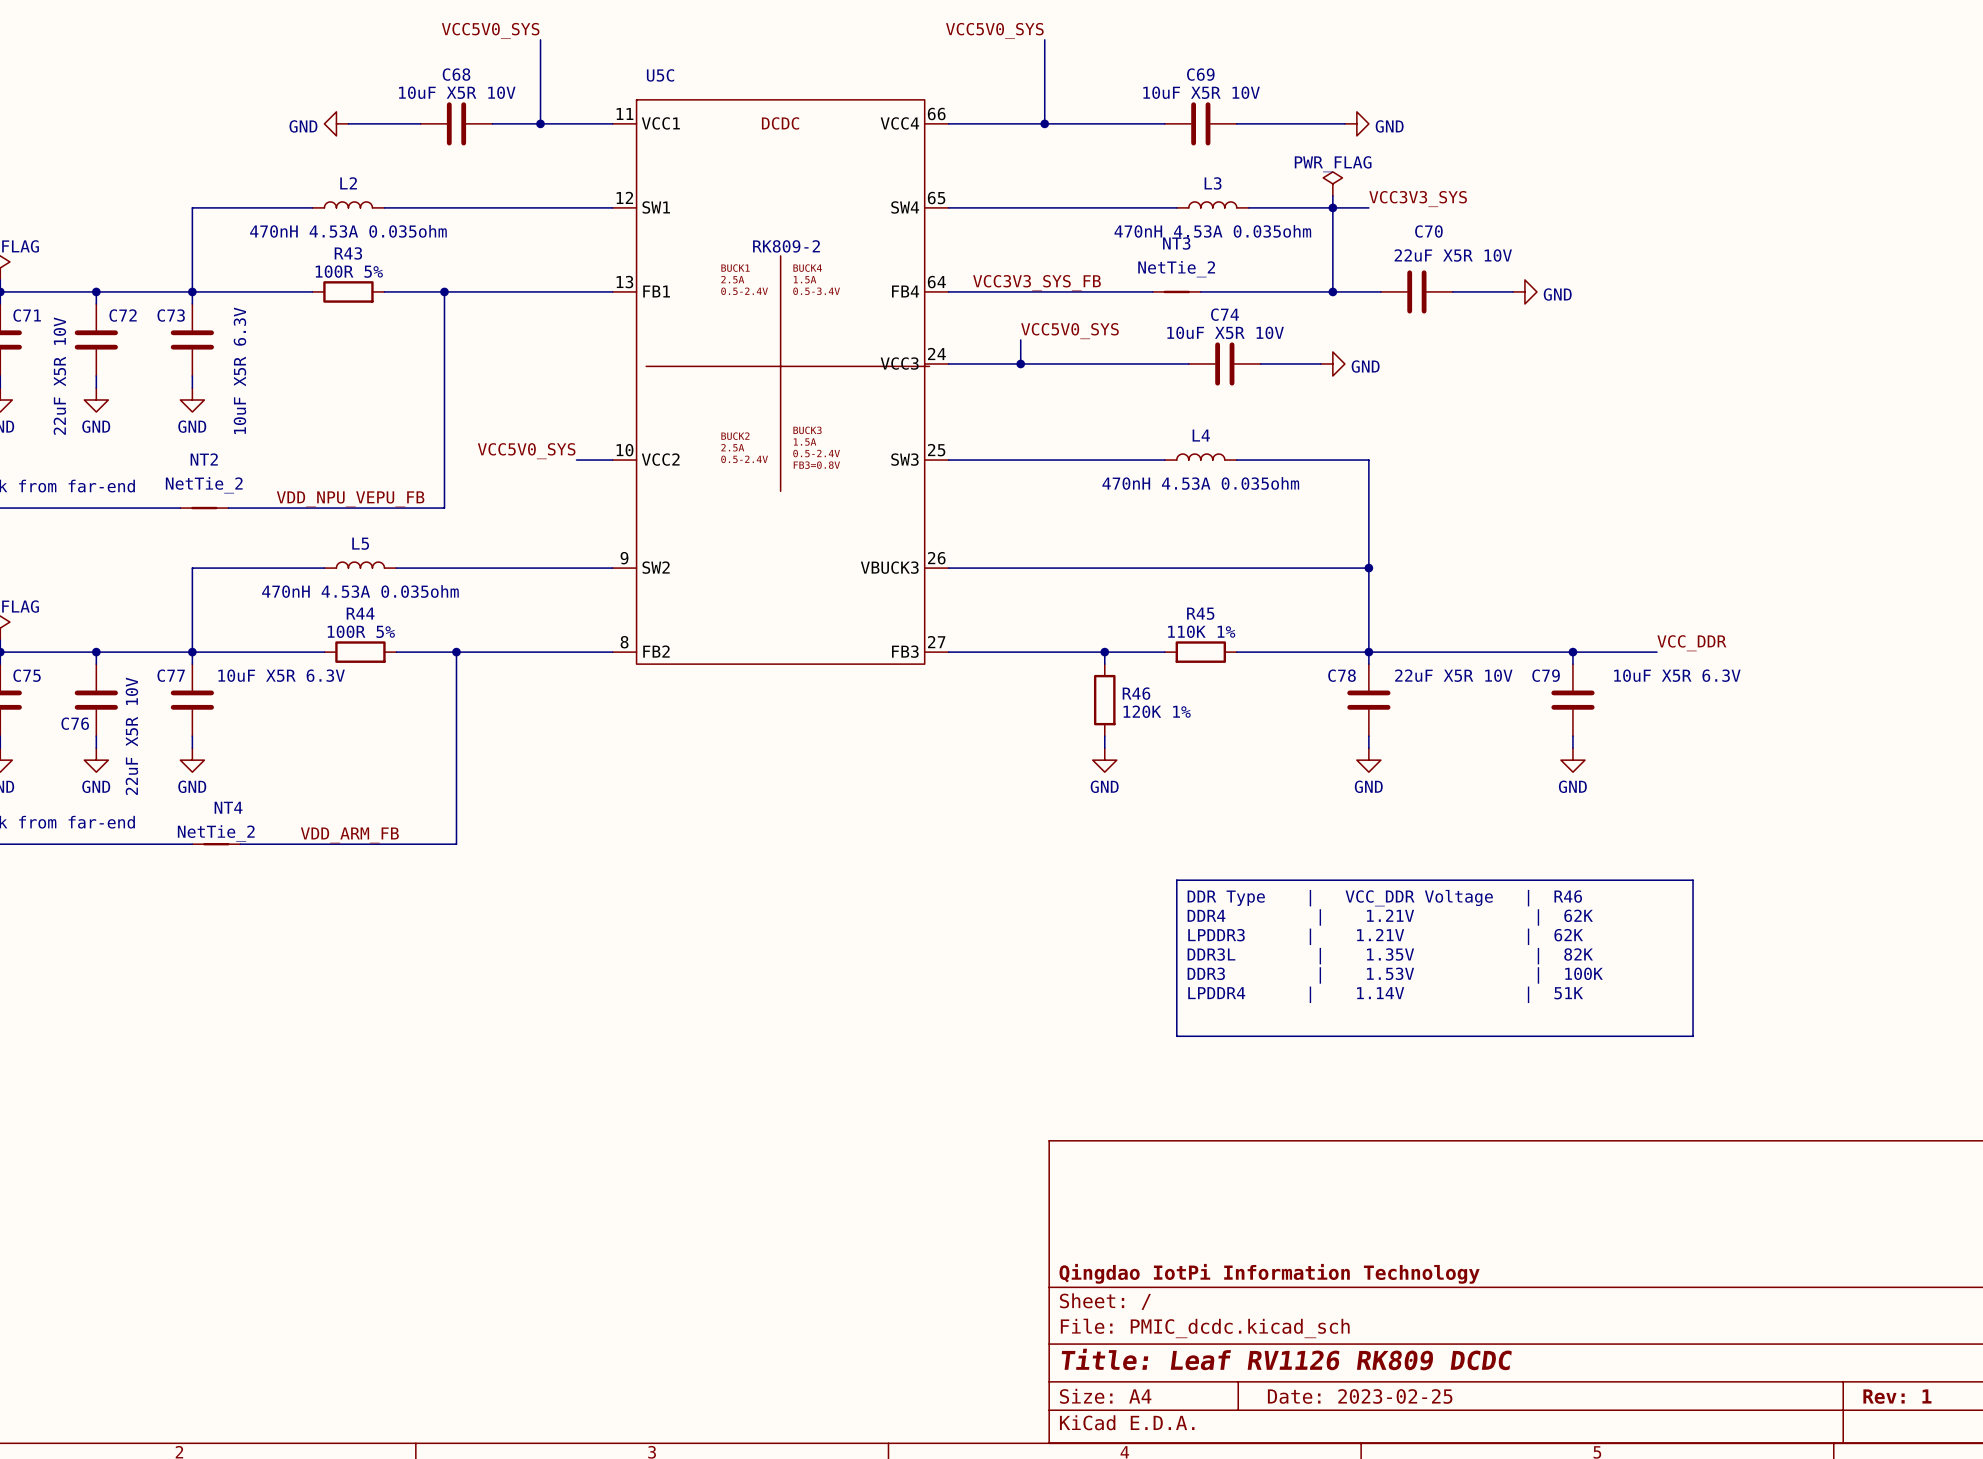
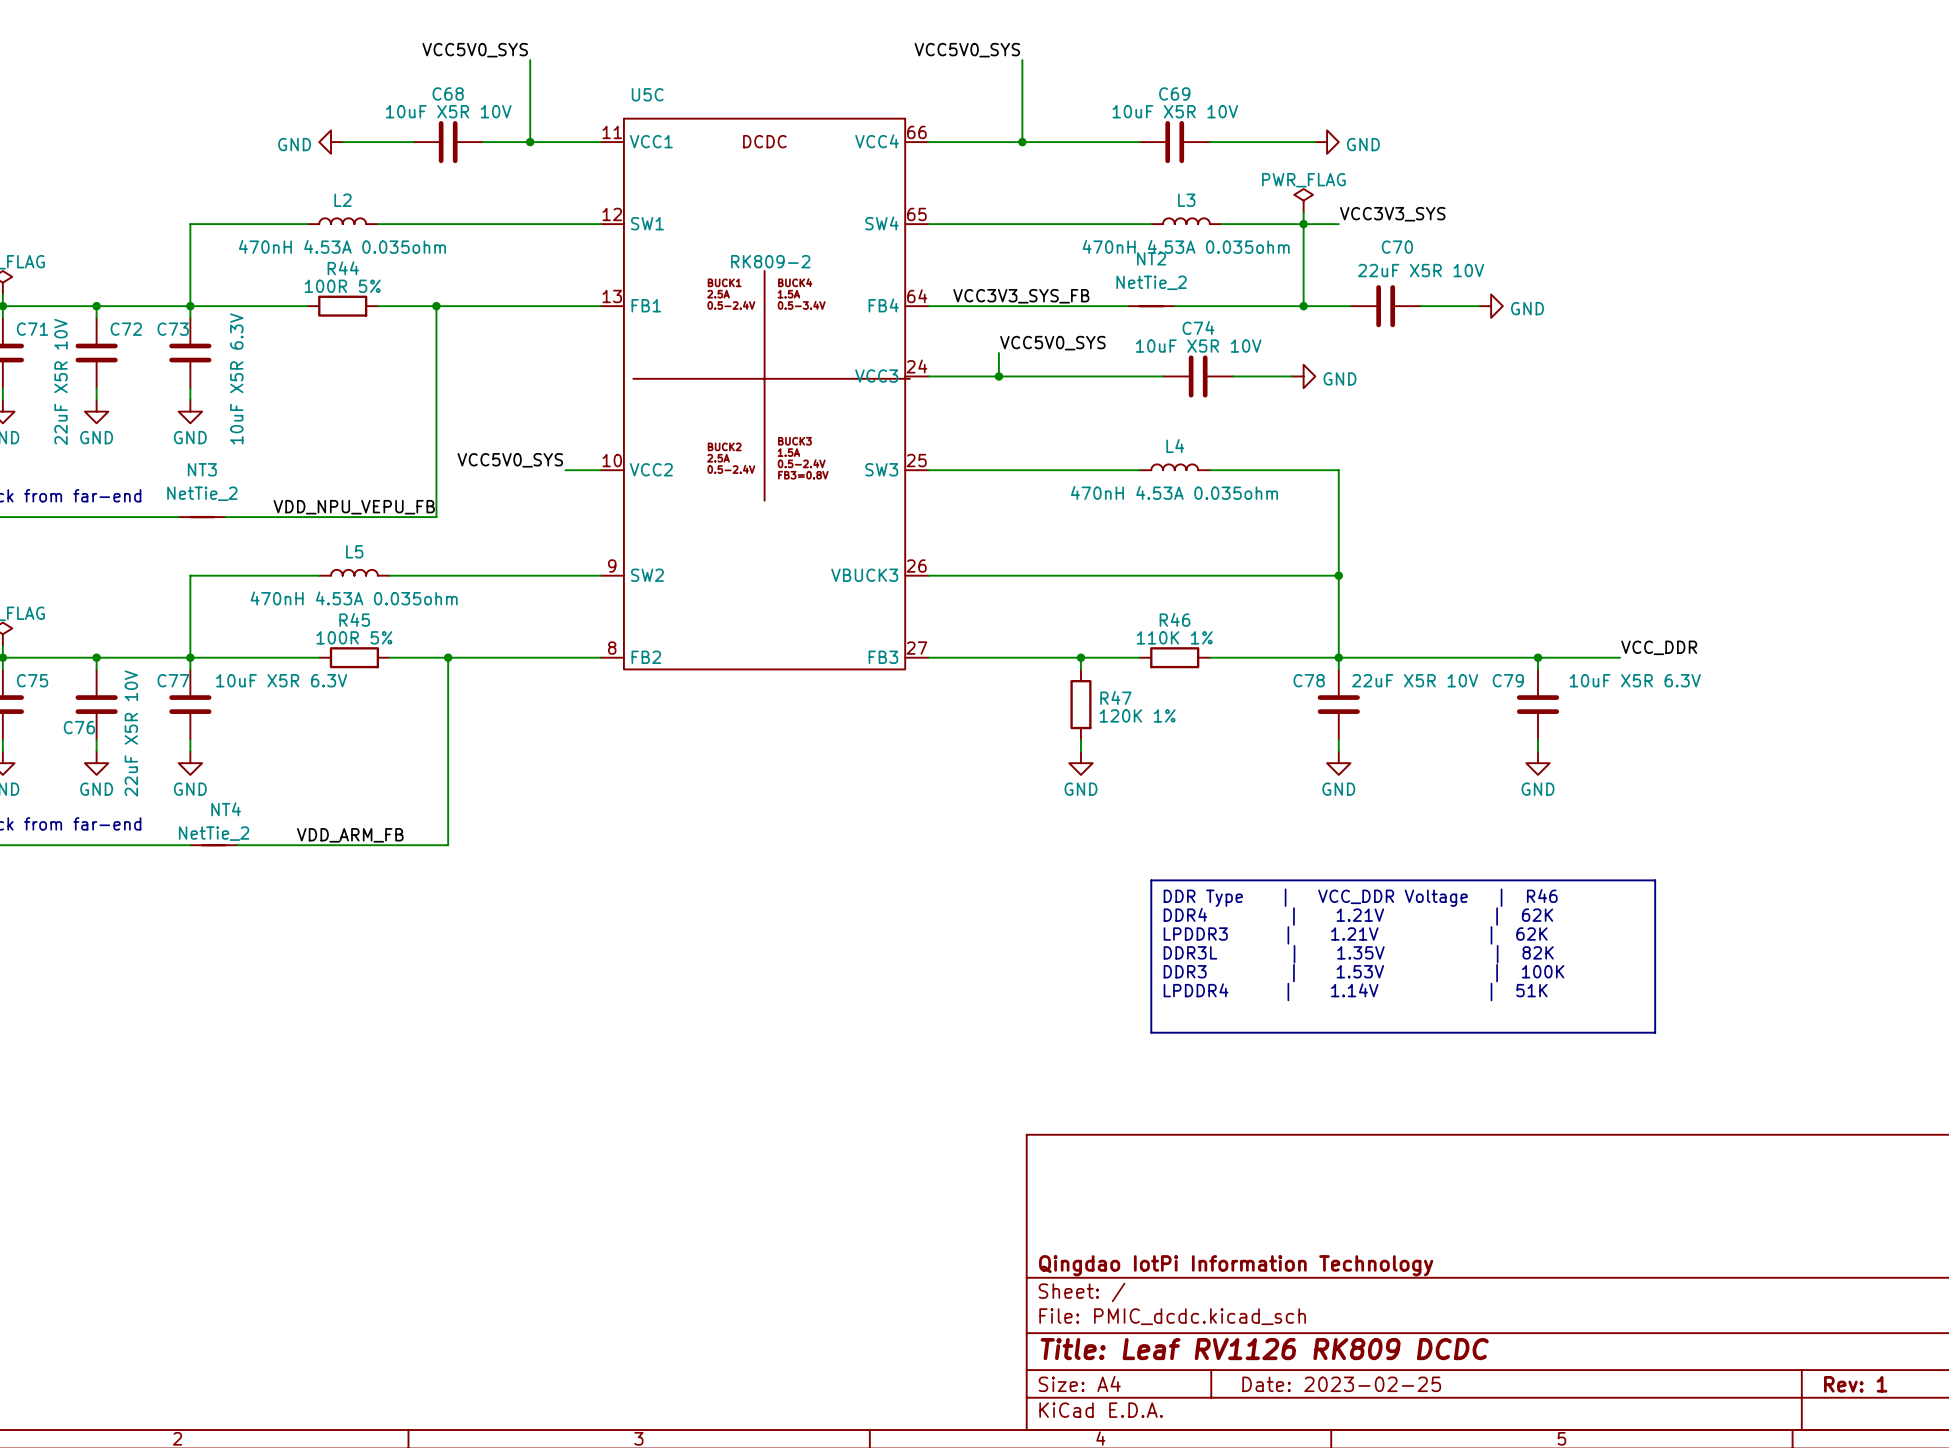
NT3 name: NT3 (1176, 243) -> NT2 (1151, 258)
R43 name: R43 (348, 253) -> R44 (343, 268)
NT2 name: NT2 (204, 459) -> NT3 (202, 469)
R44 name: R44 (360, 613) -> R45 (354, 619)
R45 name: R45 (1200, 613) -> R46 (1175, 619)
R46 name: R46 (1136, 693) -> R47 (1115, 697)

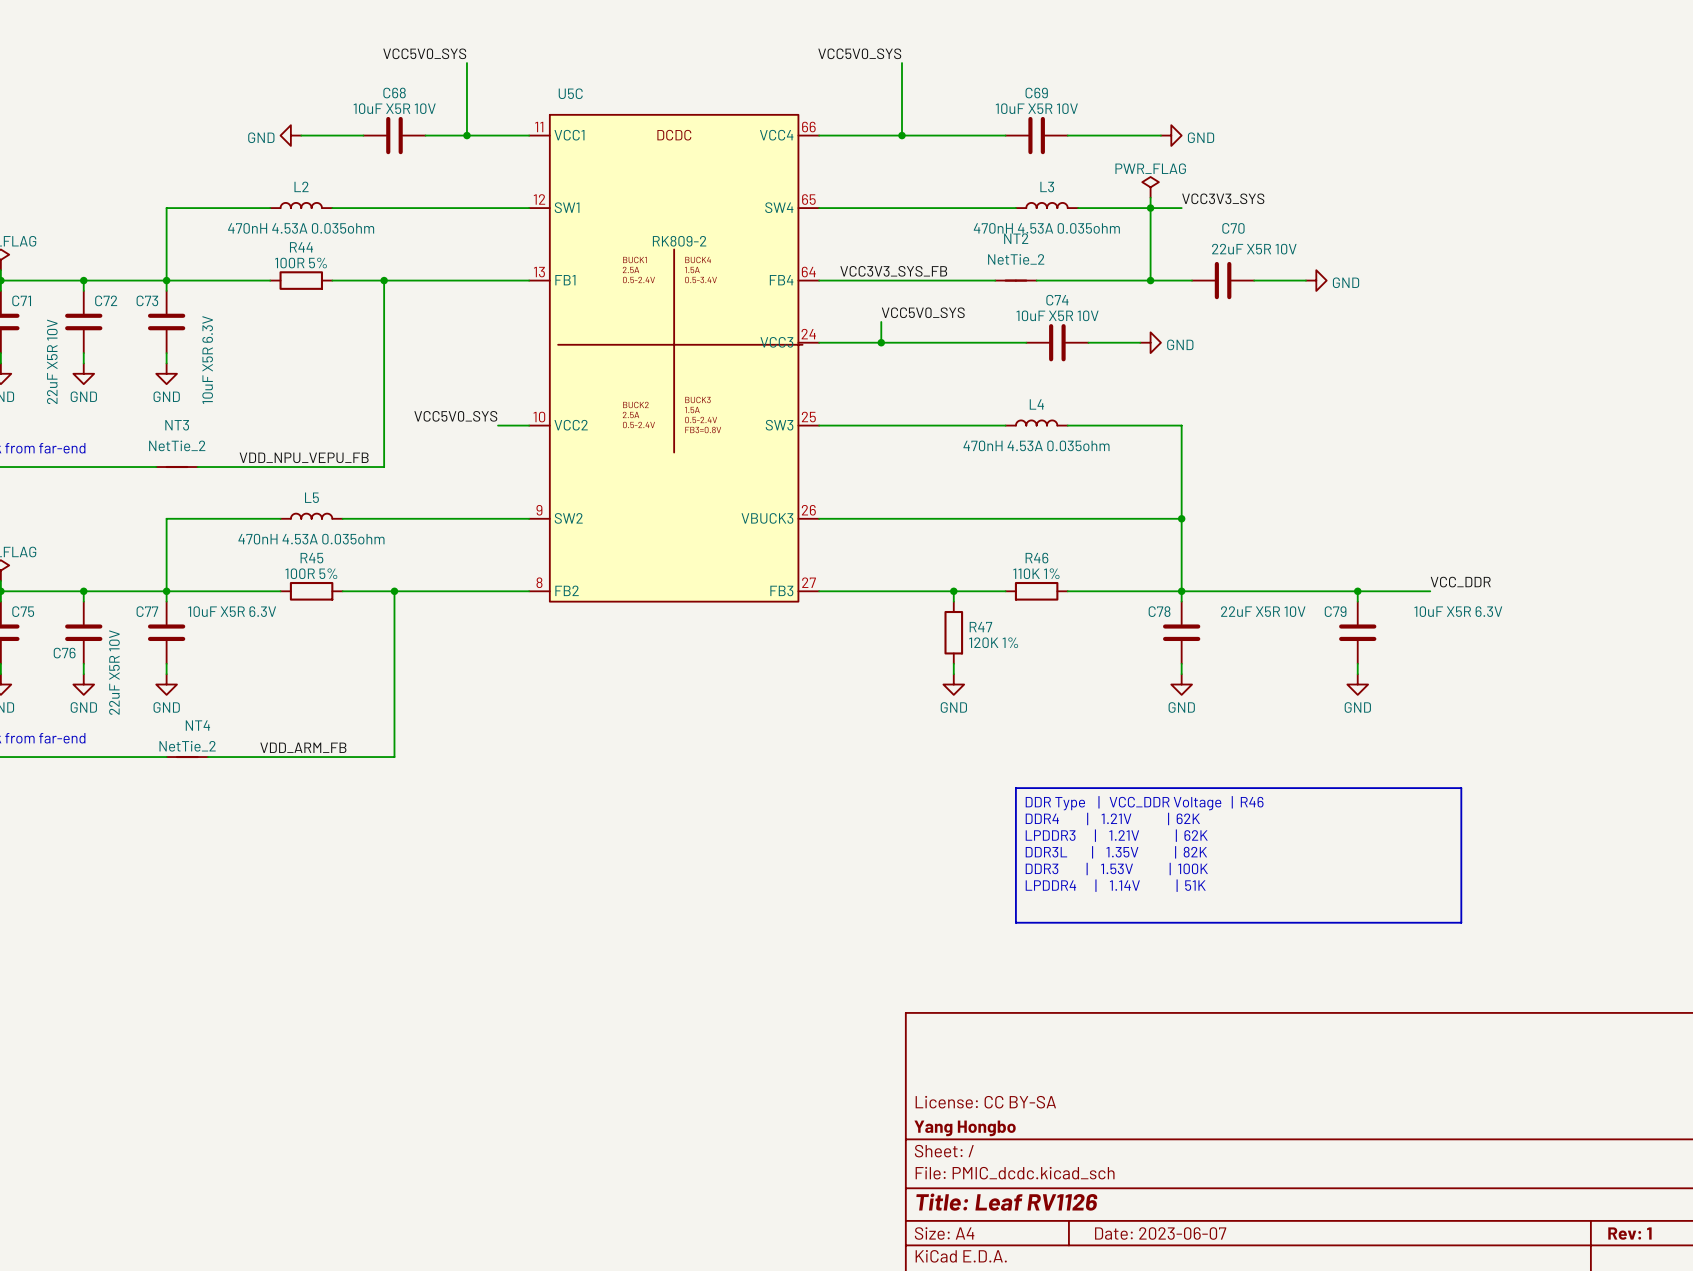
U5C symbol: [600, 118, 929, 670] -> [529, 114, 820, 602]
title block: none -> License: CC BY-SA (985, 1102)
title block: Qingdao IotPi Information Technology (1236, 1265) -> Yang Hongbo (965, 1128)
title block: Title: Leaf RV1126 RK809 DCDC (1264, 1349) -> Title: Leaf RV1126 (1006, 1202)
title block: Date: 2023-02-25 (1341, 1384) -> Date: 2023-06-07 (1160, 1233)

